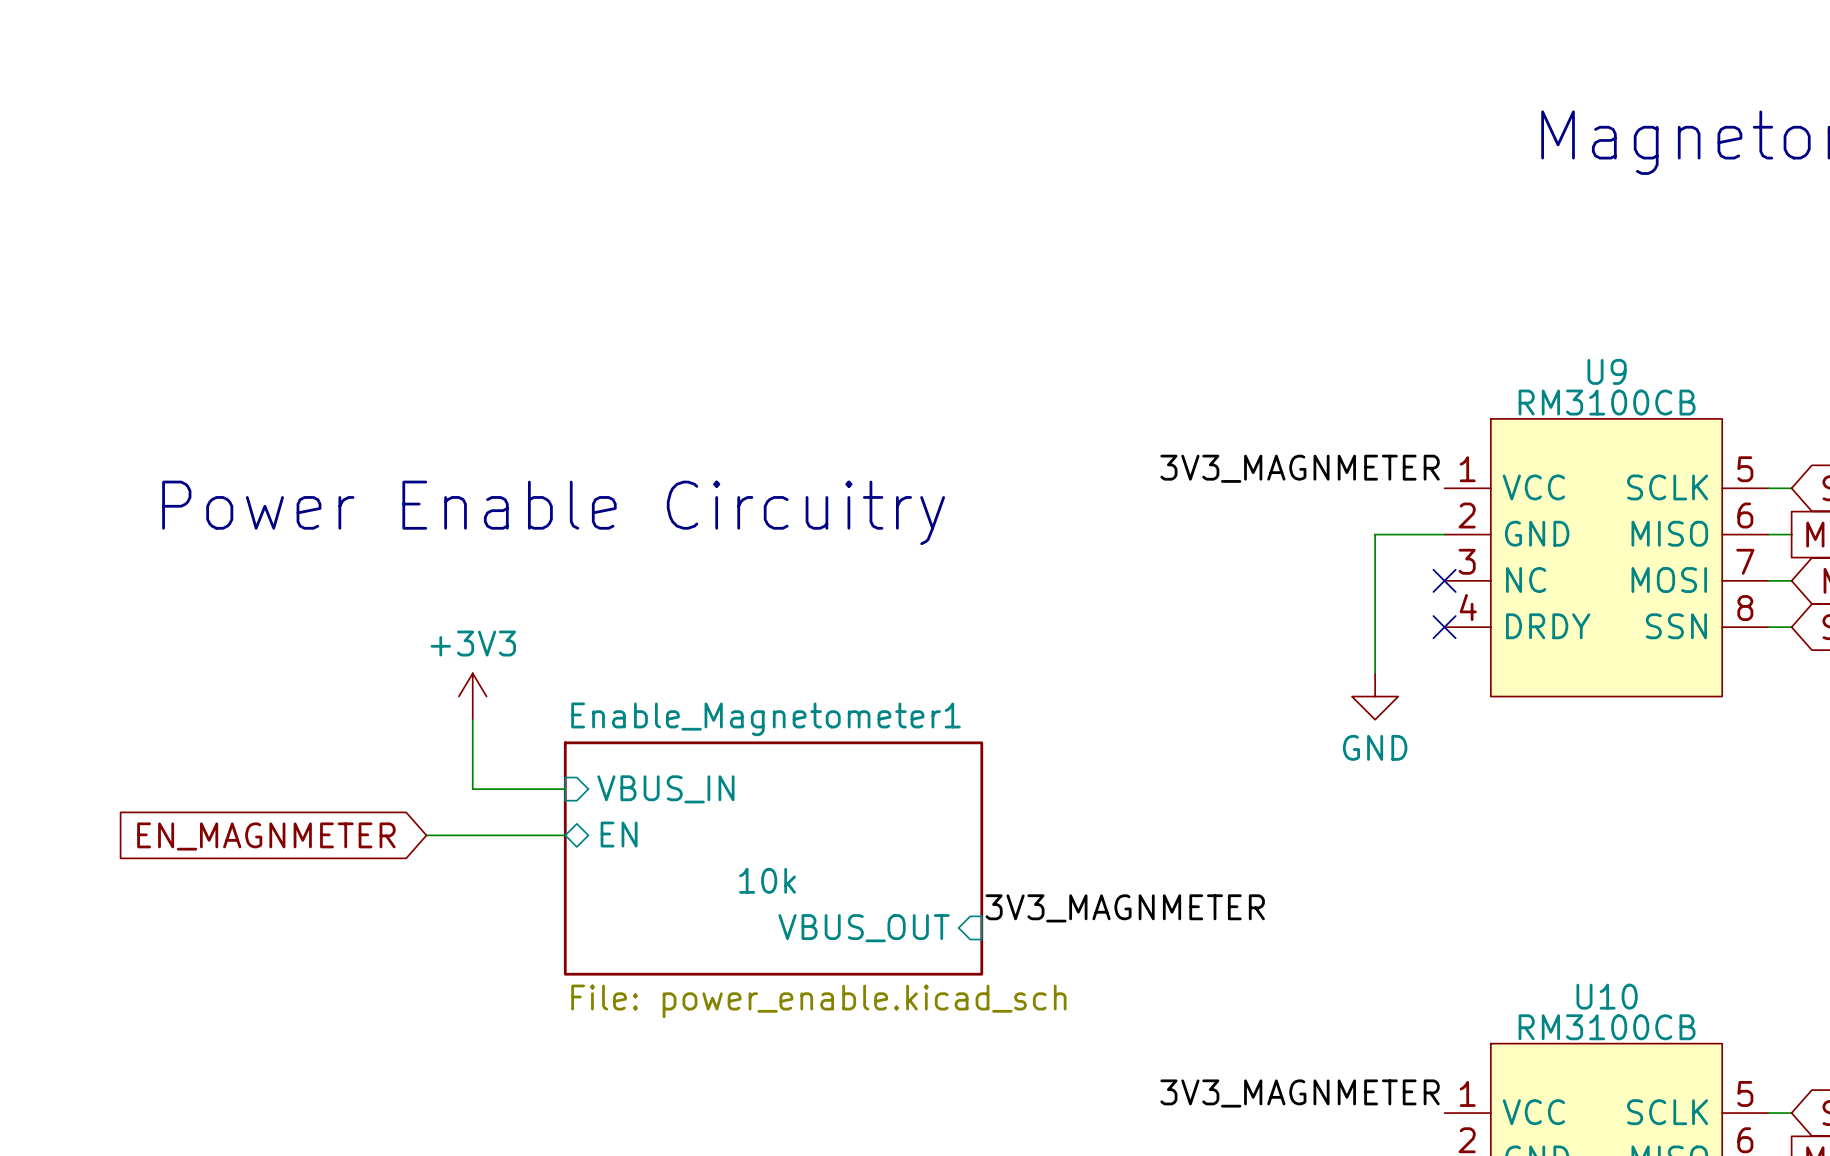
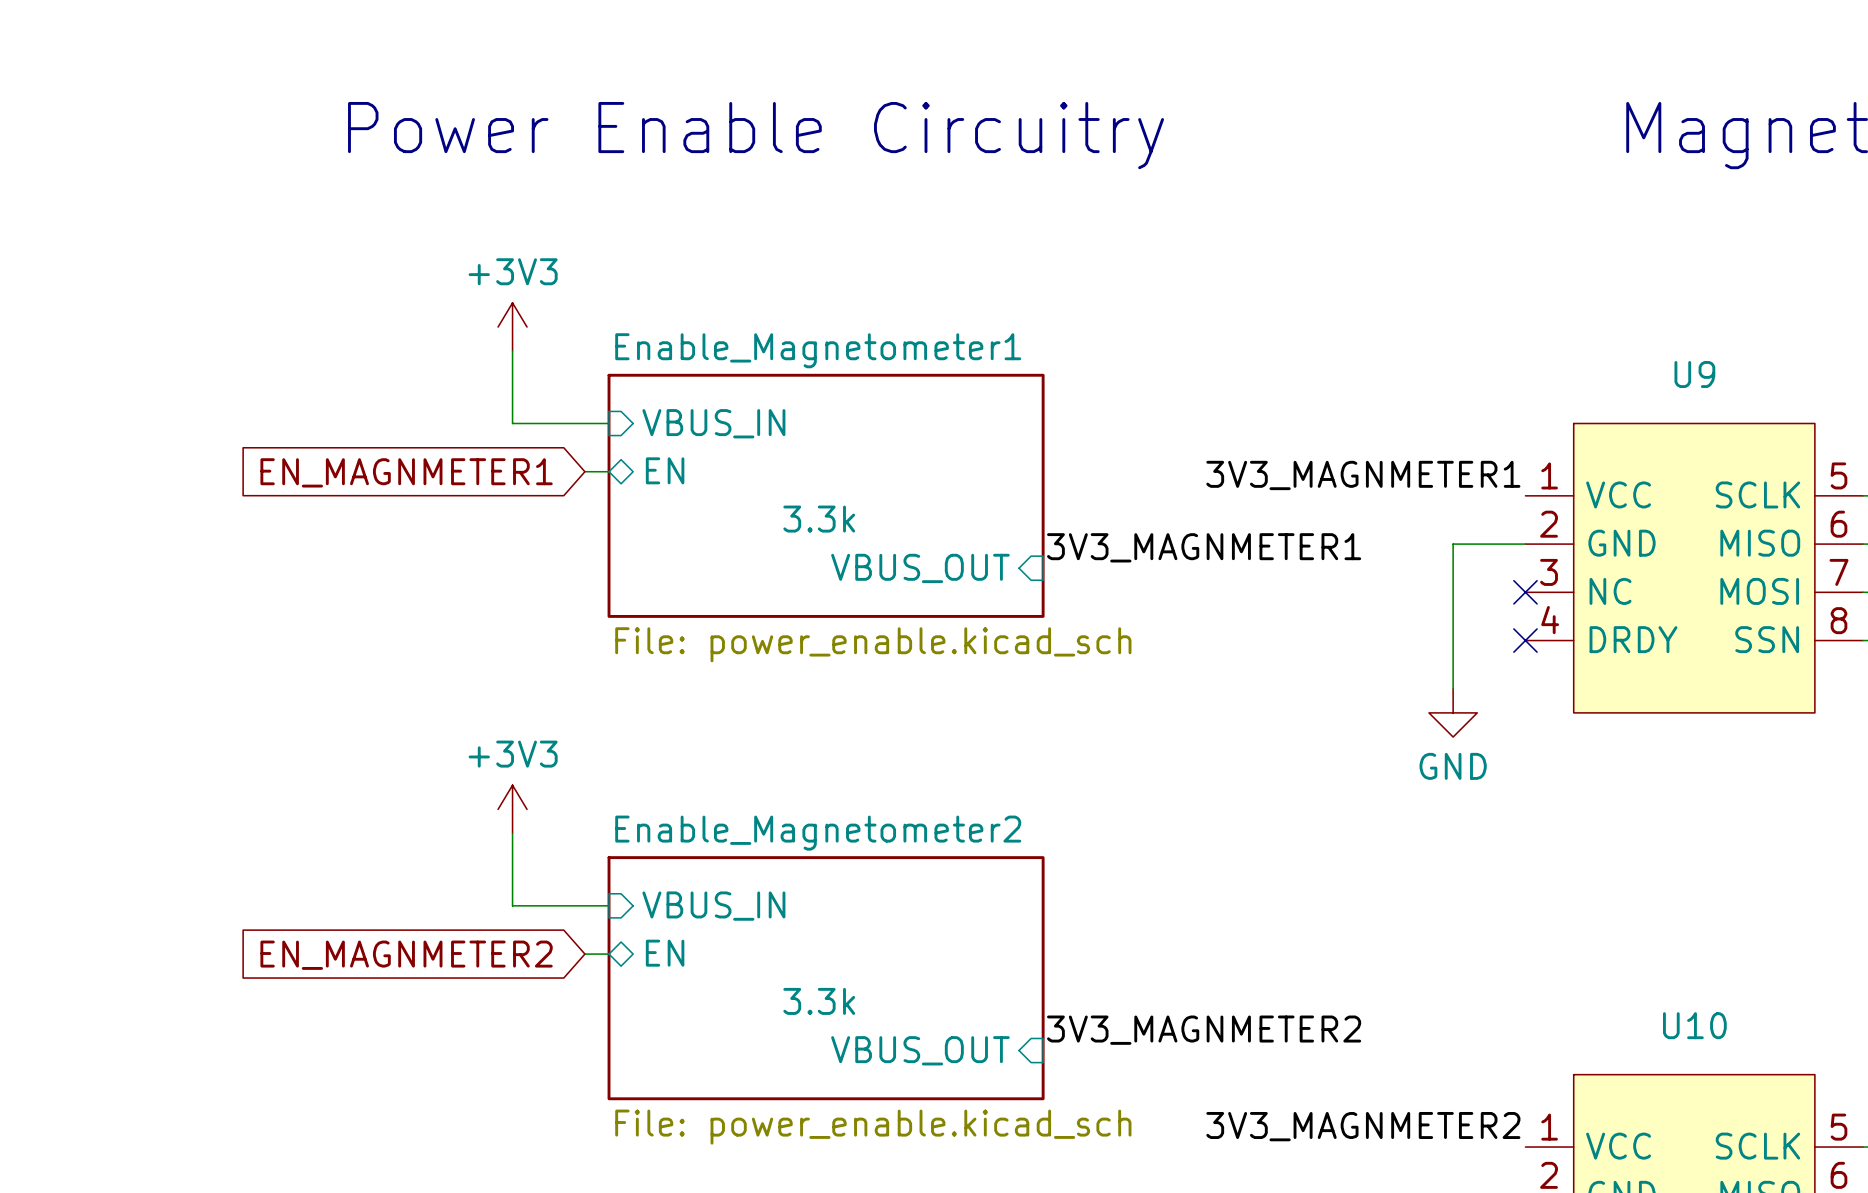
power symbol: none -> +3V3 (512, 327)
wire: none -> (512, 351) (512, 423) (609, 423)
U9 value: RM3100CB (1607, 402) -> none
sheet pin: none -> VBUS_IN (713, 423)
sheet pin: none -> EN (665, 470)
wire: none -> (584, 471) (609, 471)
global label: none -> EN_MAGNMETER1 (406, 472)
label: 3V3_MAGNMETER (1300, 468) -> 3V3_MAGNMETER1 (1363, 475)
text position: Power Enable Circuitry (553, 512) -> Power Enable Circuitry (756, 135)
label: none -> 3V3_MAGNMETER1 (1204, 547)
sheet pin: none -> VBUS_OUT (920, 568)
power symbol position: +3V3 (472, 696) -> +3V3 (512, 809)
wire: (472, 719) (472, 789) (565, 789) -> (512, 833) (512, 905) (609, 905)
sheet pin position: VBUS_IN (665, 789) -> VBUS_IN (713, 906)
sheet pin position: EN (619, 834) -> EN (665, 953)
wire: (426, 835) (565, 835) -> none
global label: EN_MAGNMETER (266, 836) -> none
sheet Enable_Magnetometer1 position: (773, 858) -> (826, 495)
sheet Enable_Magnetometer1 text: 10k (767, 880) -> 3.3k (819, 519)
label: 3V3_MAGNMETER (1125, 908) -> none
wire: none -> (584, 954) (609, 954)
sheet pin position: VBUS_OUT (864, 928) -> VBUS_OUT (920, 1050)
global label: none -> EN_MAGNMETER2 (406, 955)
sheet Enable_Magnetometer2: none -> File: power_enable.kicad_sch (826, 978)
label: none -> 3V3_MAGNMETER2 (1204, 1030)
U10 value: RM3100CB (1607, 1027) -> none
label: 3V3_MAGNMETER (1300, 1093) -> 3V3_MAGNMETER2 (1363, 1126)

